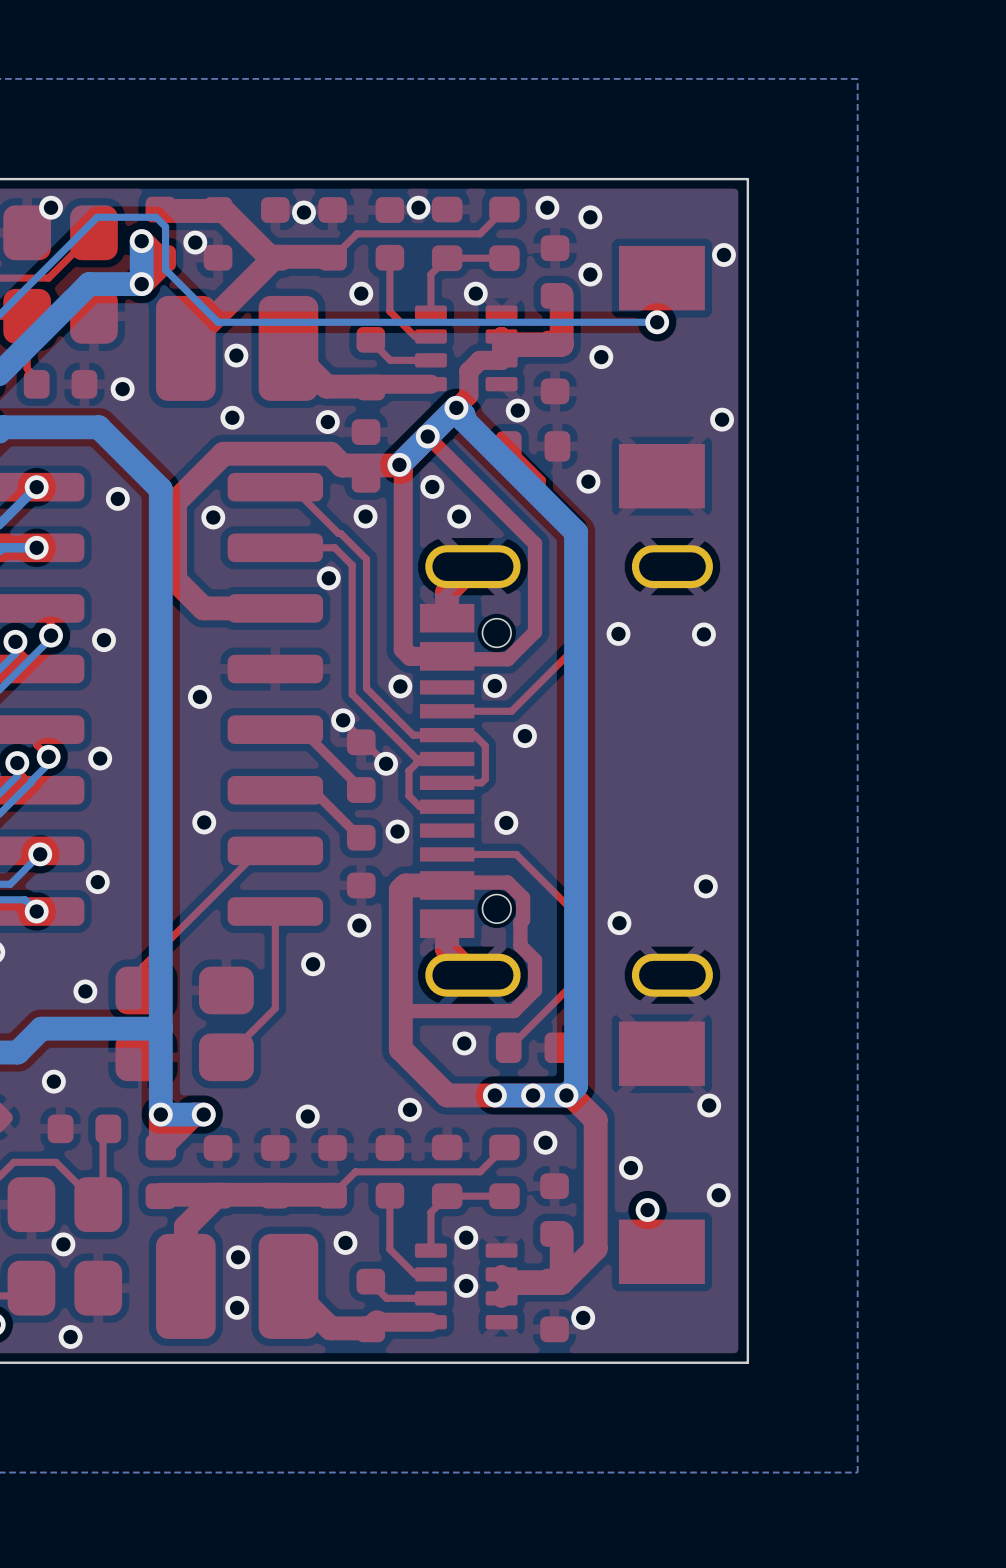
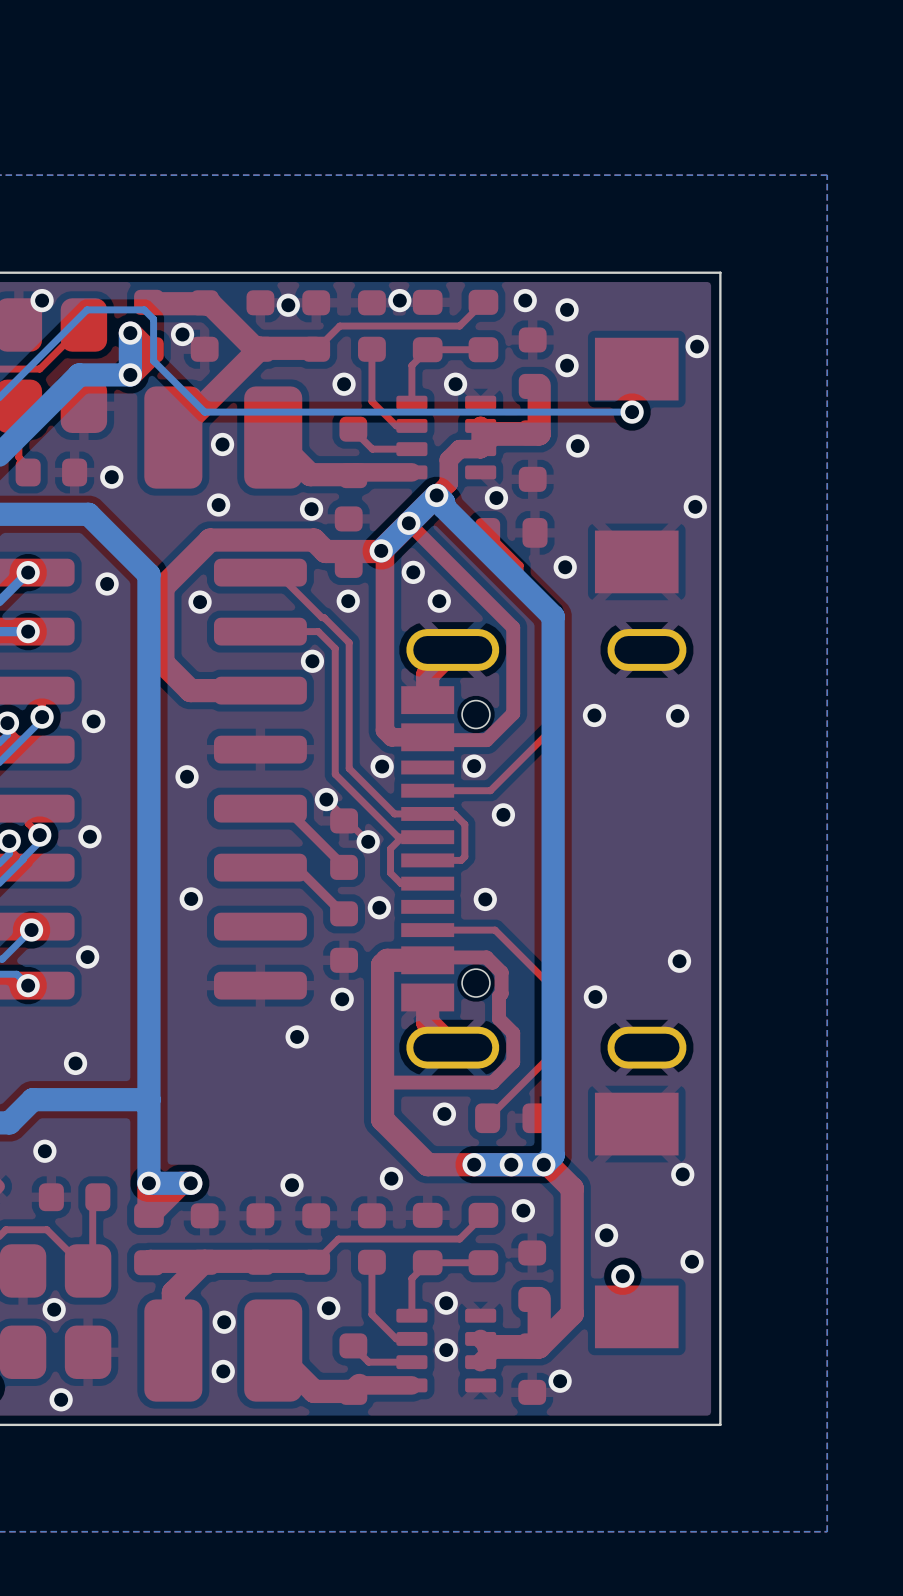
top track: (275, 850) (258, 850) (142, 966) (142, 990) -> none
top track: (275, 911) (275, 1008) (226, 1057) -> none
part: (184, 1023) -> none

